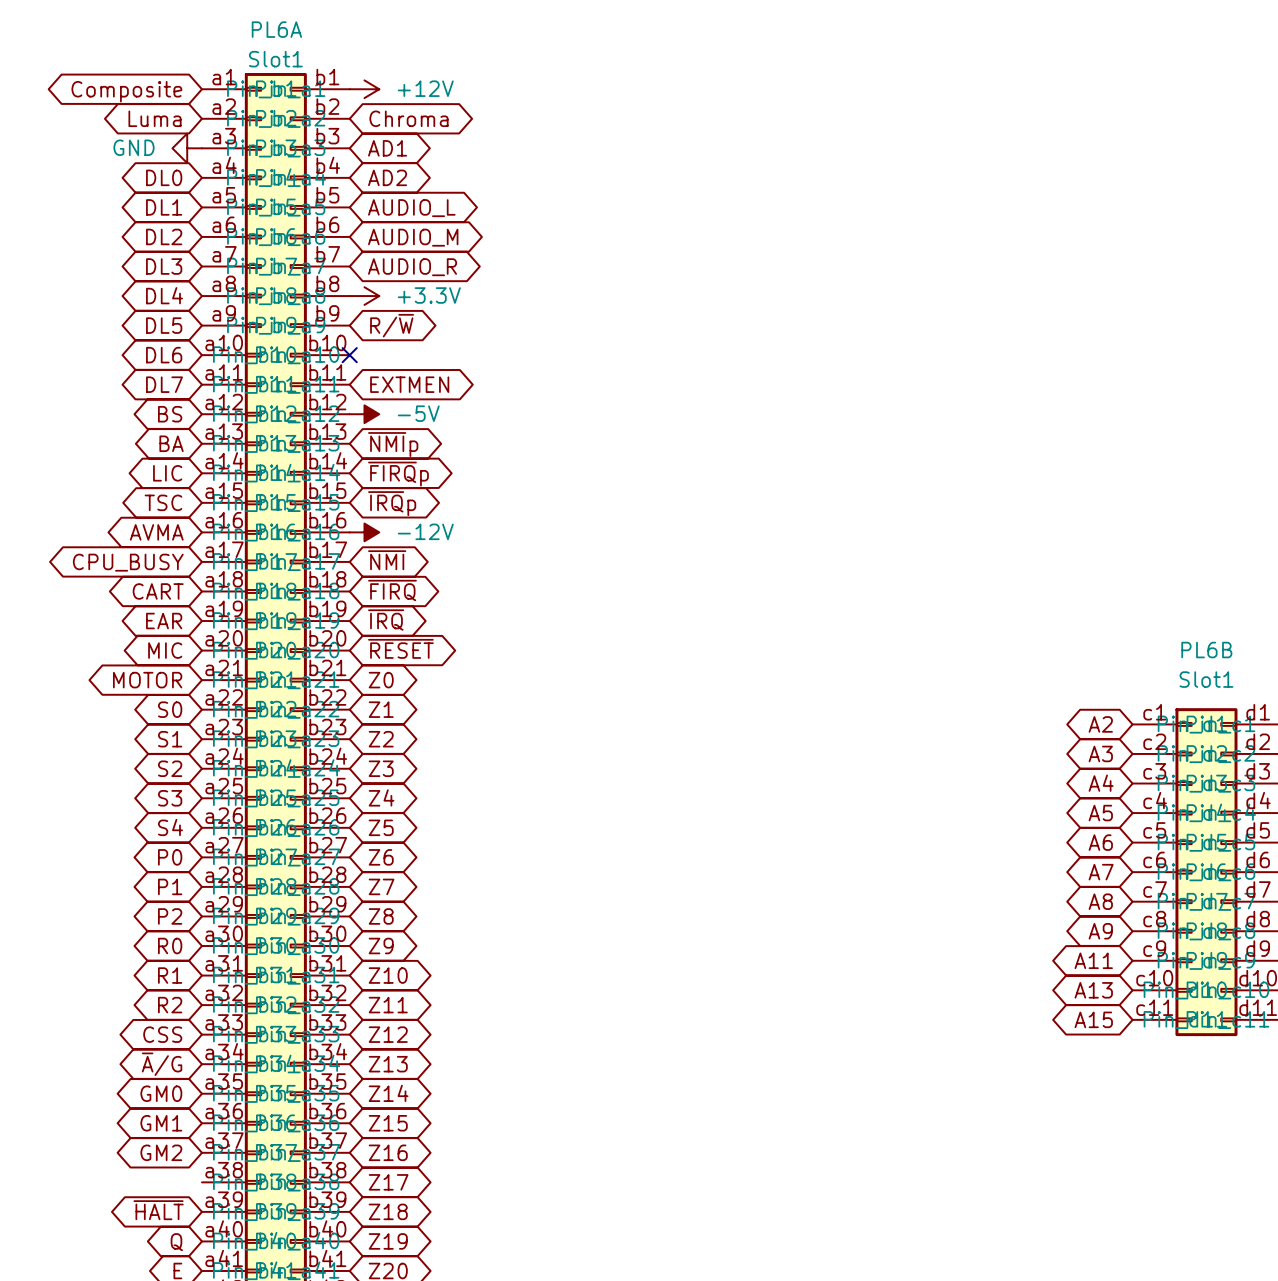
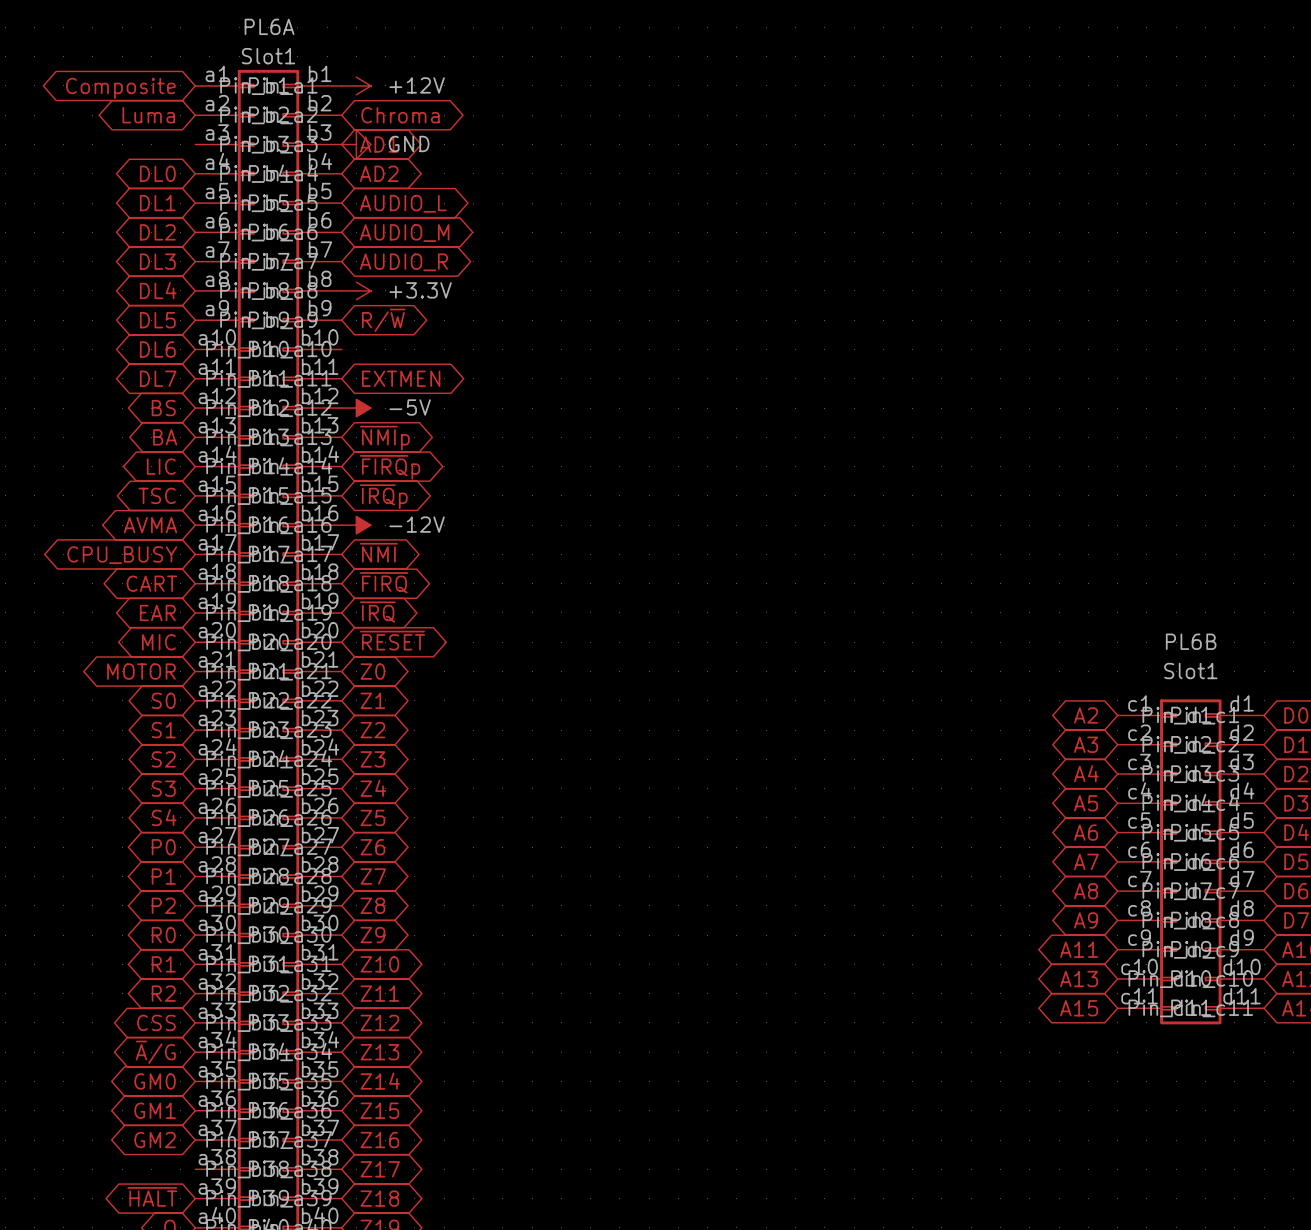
power symbol rotation: 0° (187, 148) -> 180° (356, 144)
power symbol position: GND (187, 148) -> GND (356, 144)
no-connect mark: (349, 355) -> none

